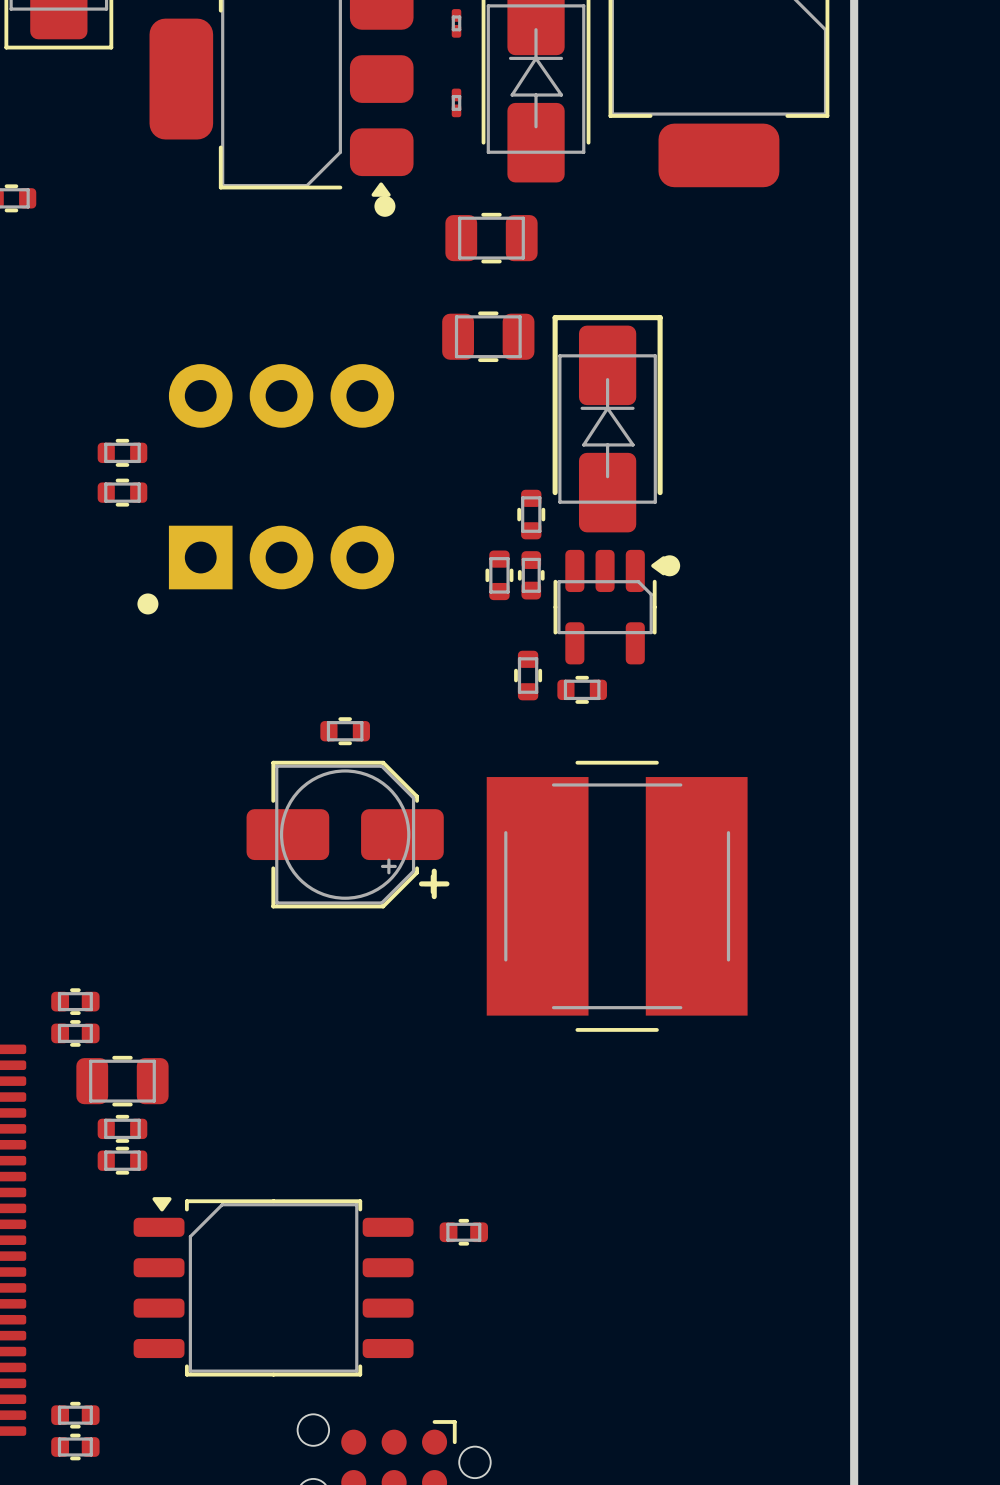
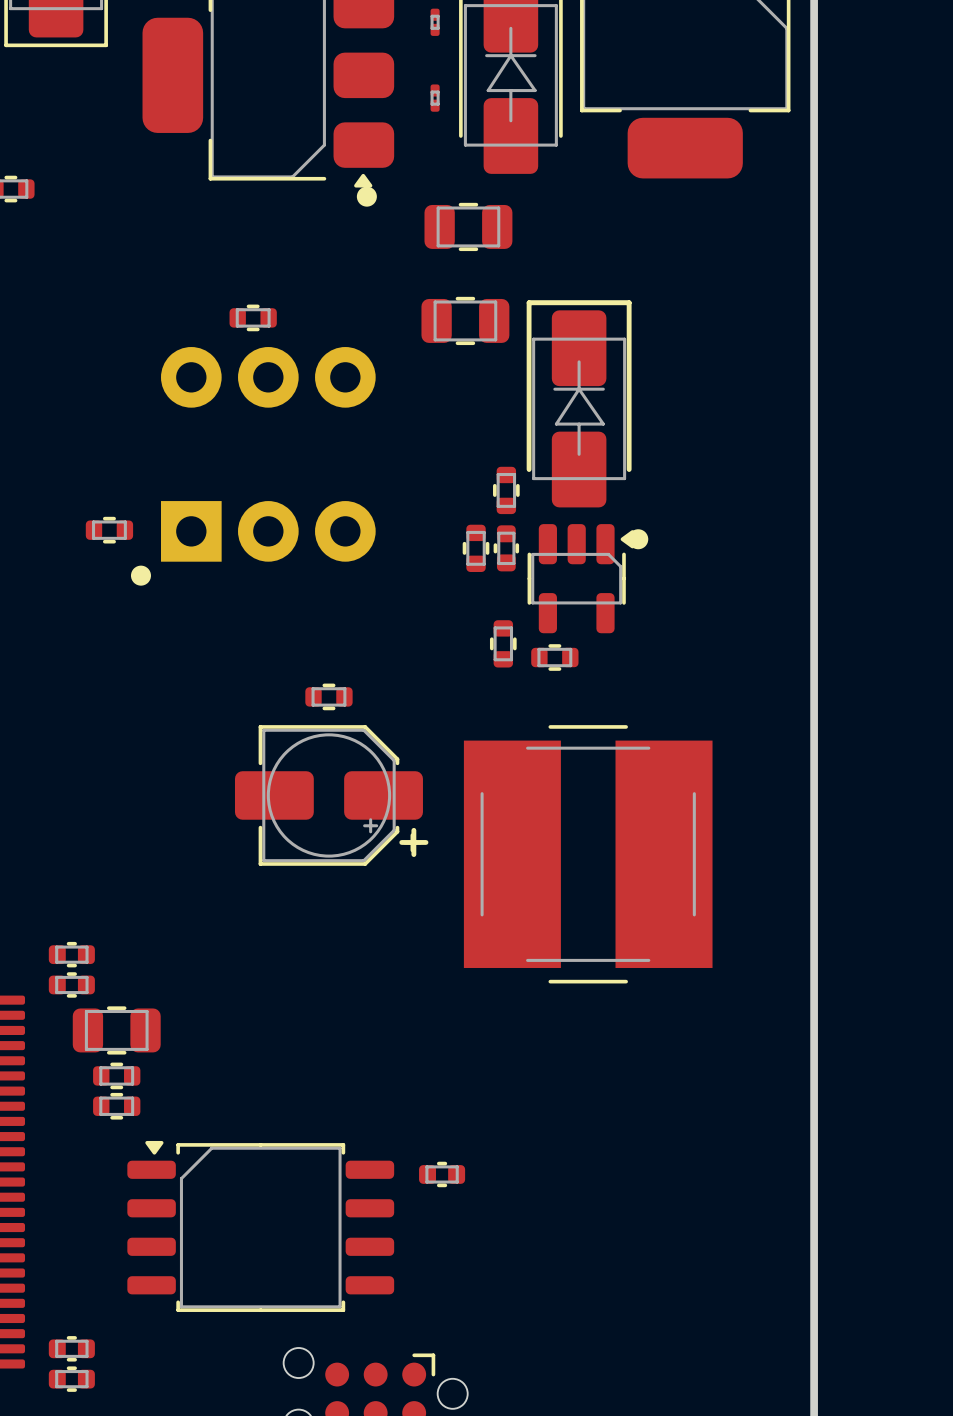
part: none -> (253, 317)
part: (122, 452) -> none
part: (122, 492) -> none
part: none -> (109, 530)

